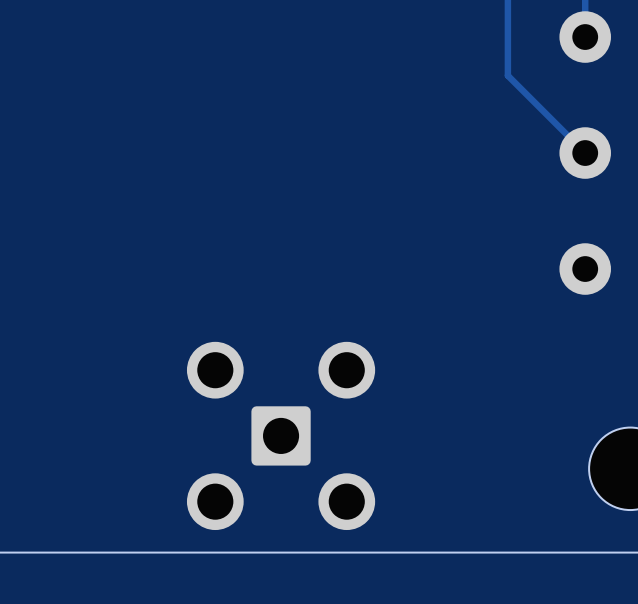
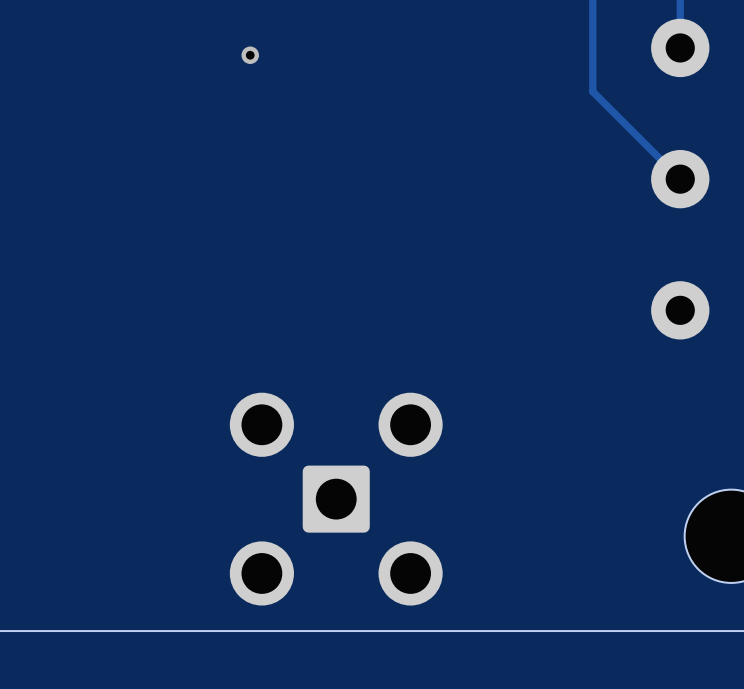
via: none -> (250, 55)

